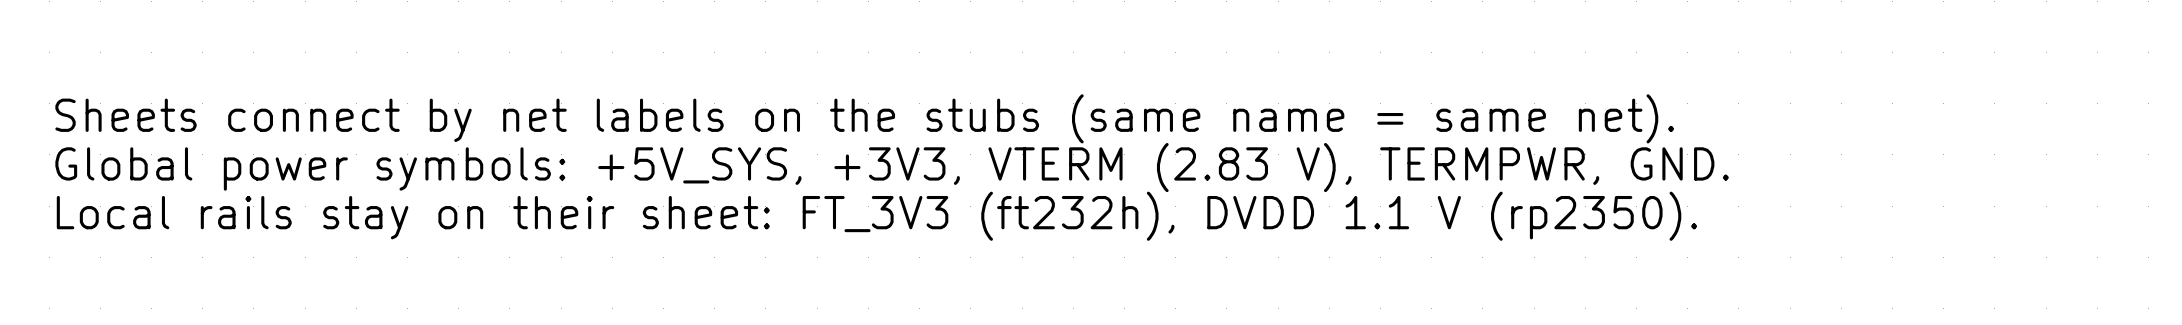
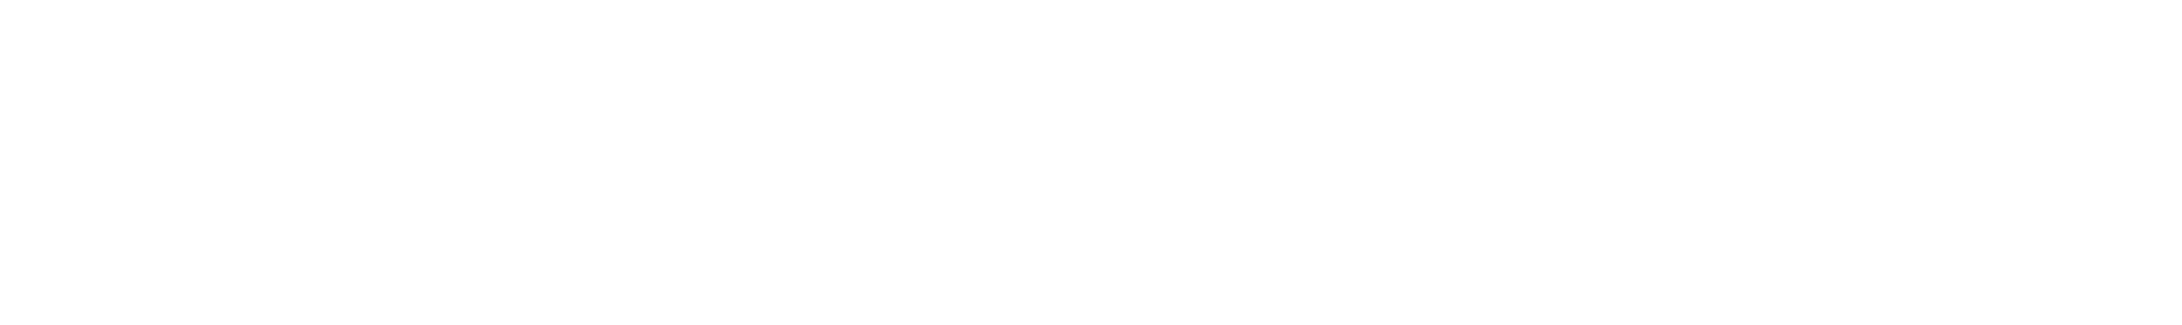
text: Sheets connect by net labels on the stubs (same name = same net). (864, 118) -> none
text: Global power symbols: +5V_SYS, +3V3, VTERM (2.83 V), TERMPWR, GND. (892, 167) -> none
text: Local rails stay on their sheet: FT_3V3 (ft232h), DVDD 1.1 V (rp2350). (876, 216) -> none

